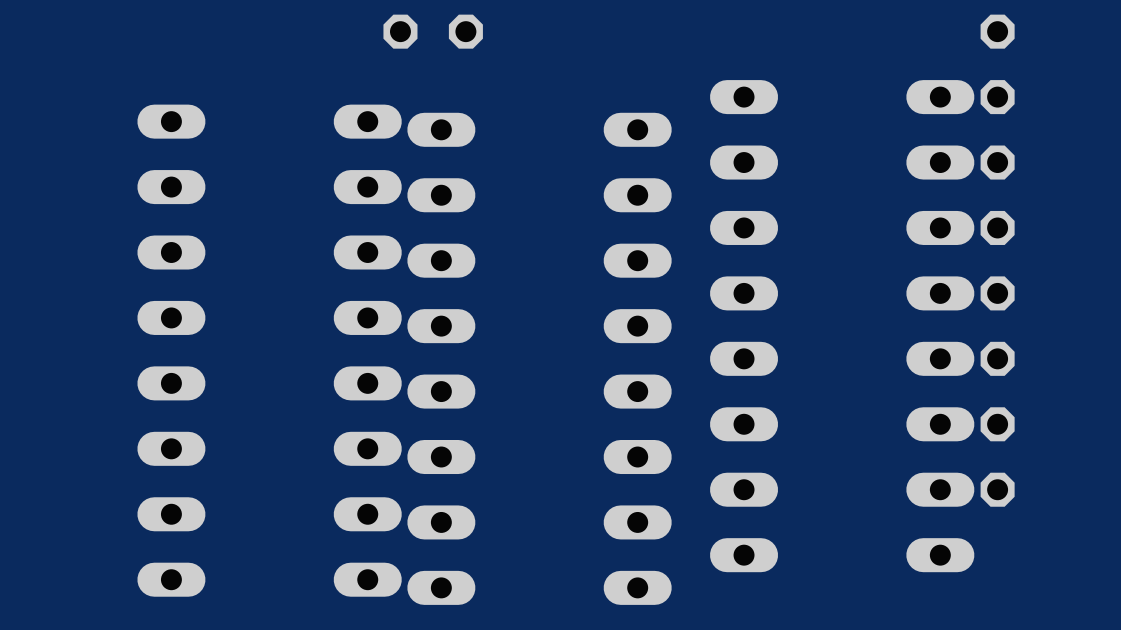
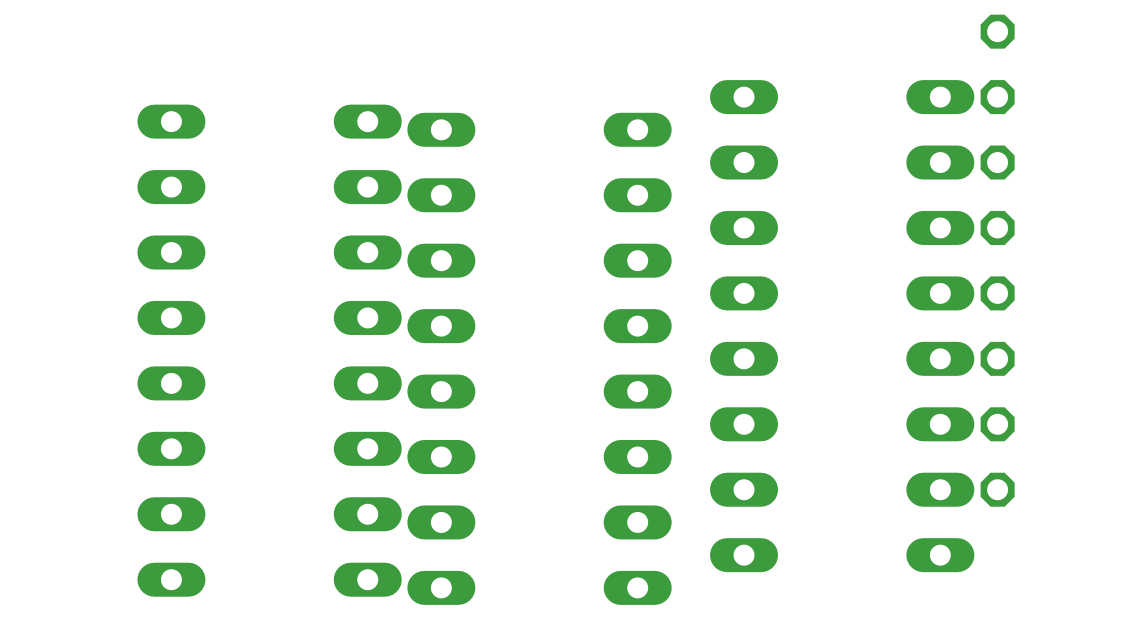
part: (433, 31) -> none

